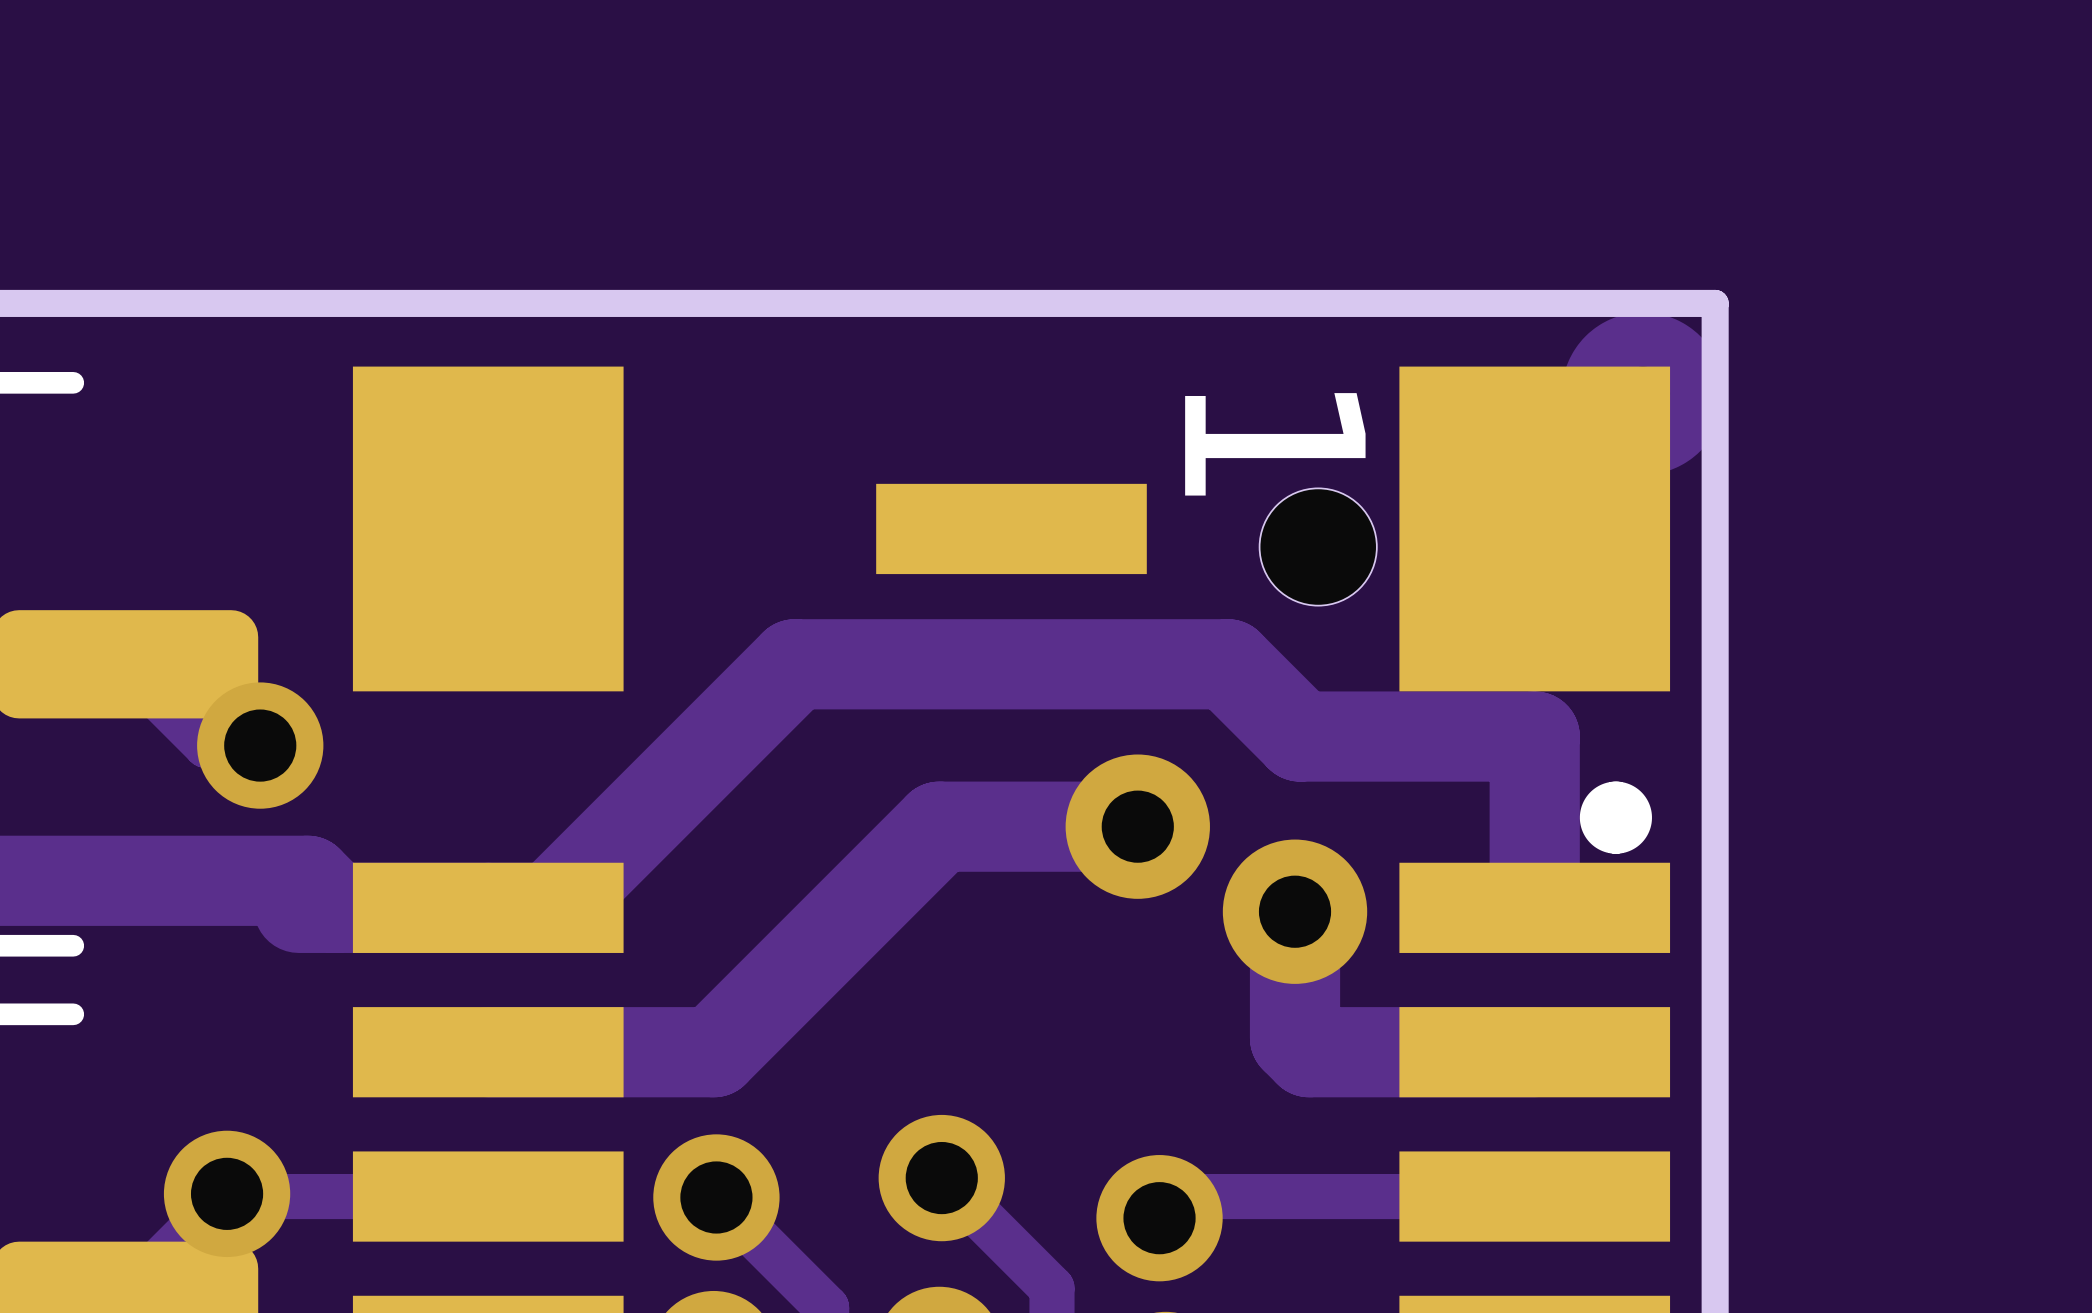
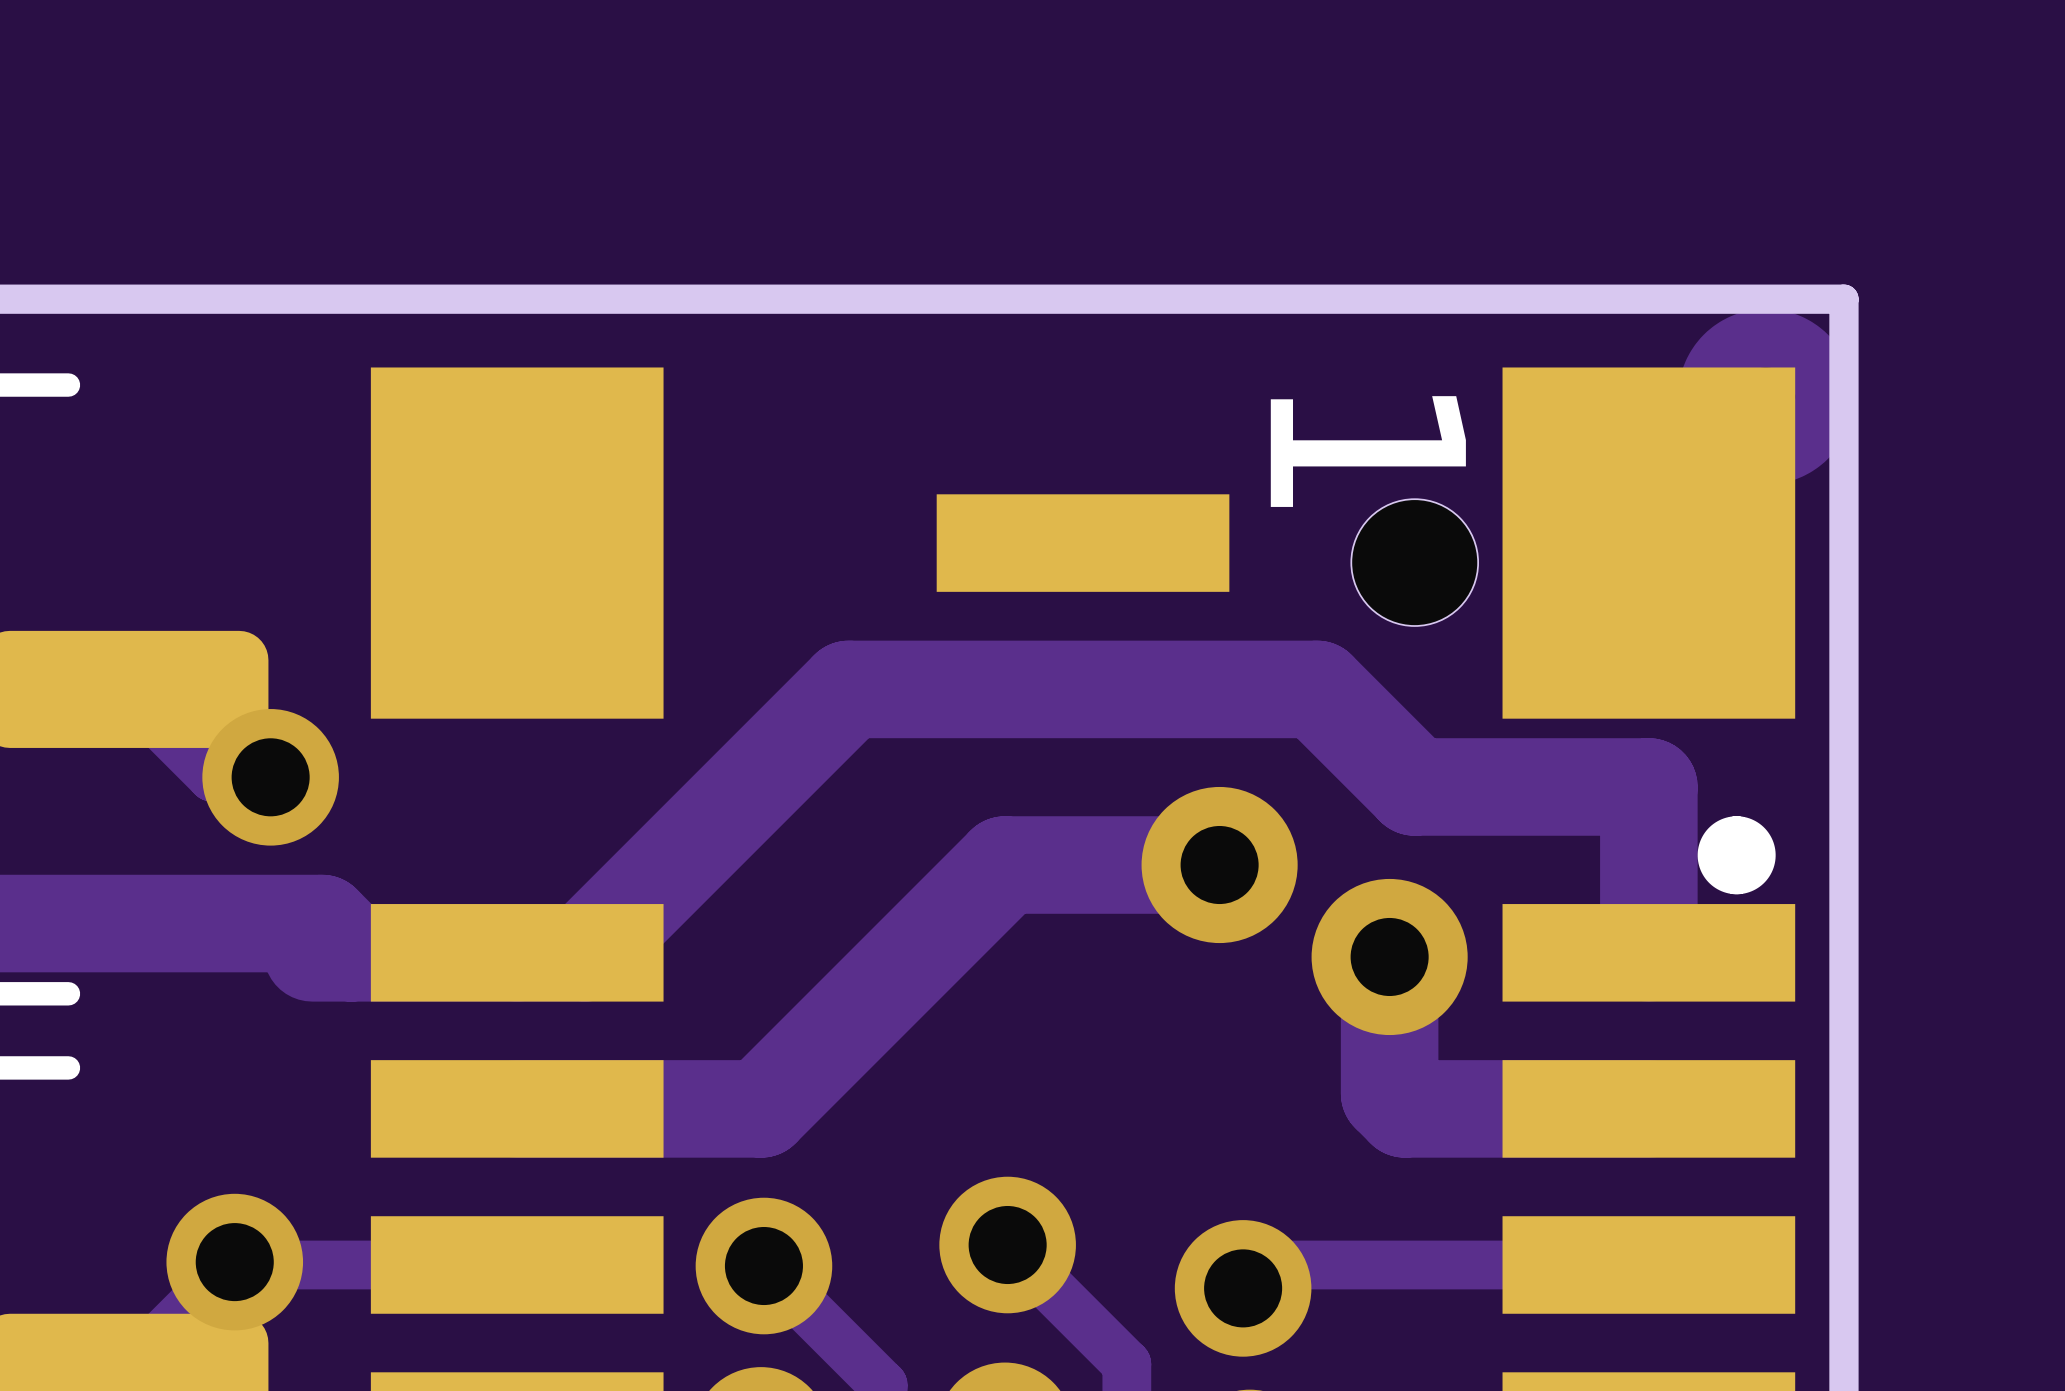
track: (1300, 736) (1534, 736) (1534, 754) -> (1395, 767) (1414, 786) (1648, 786)

